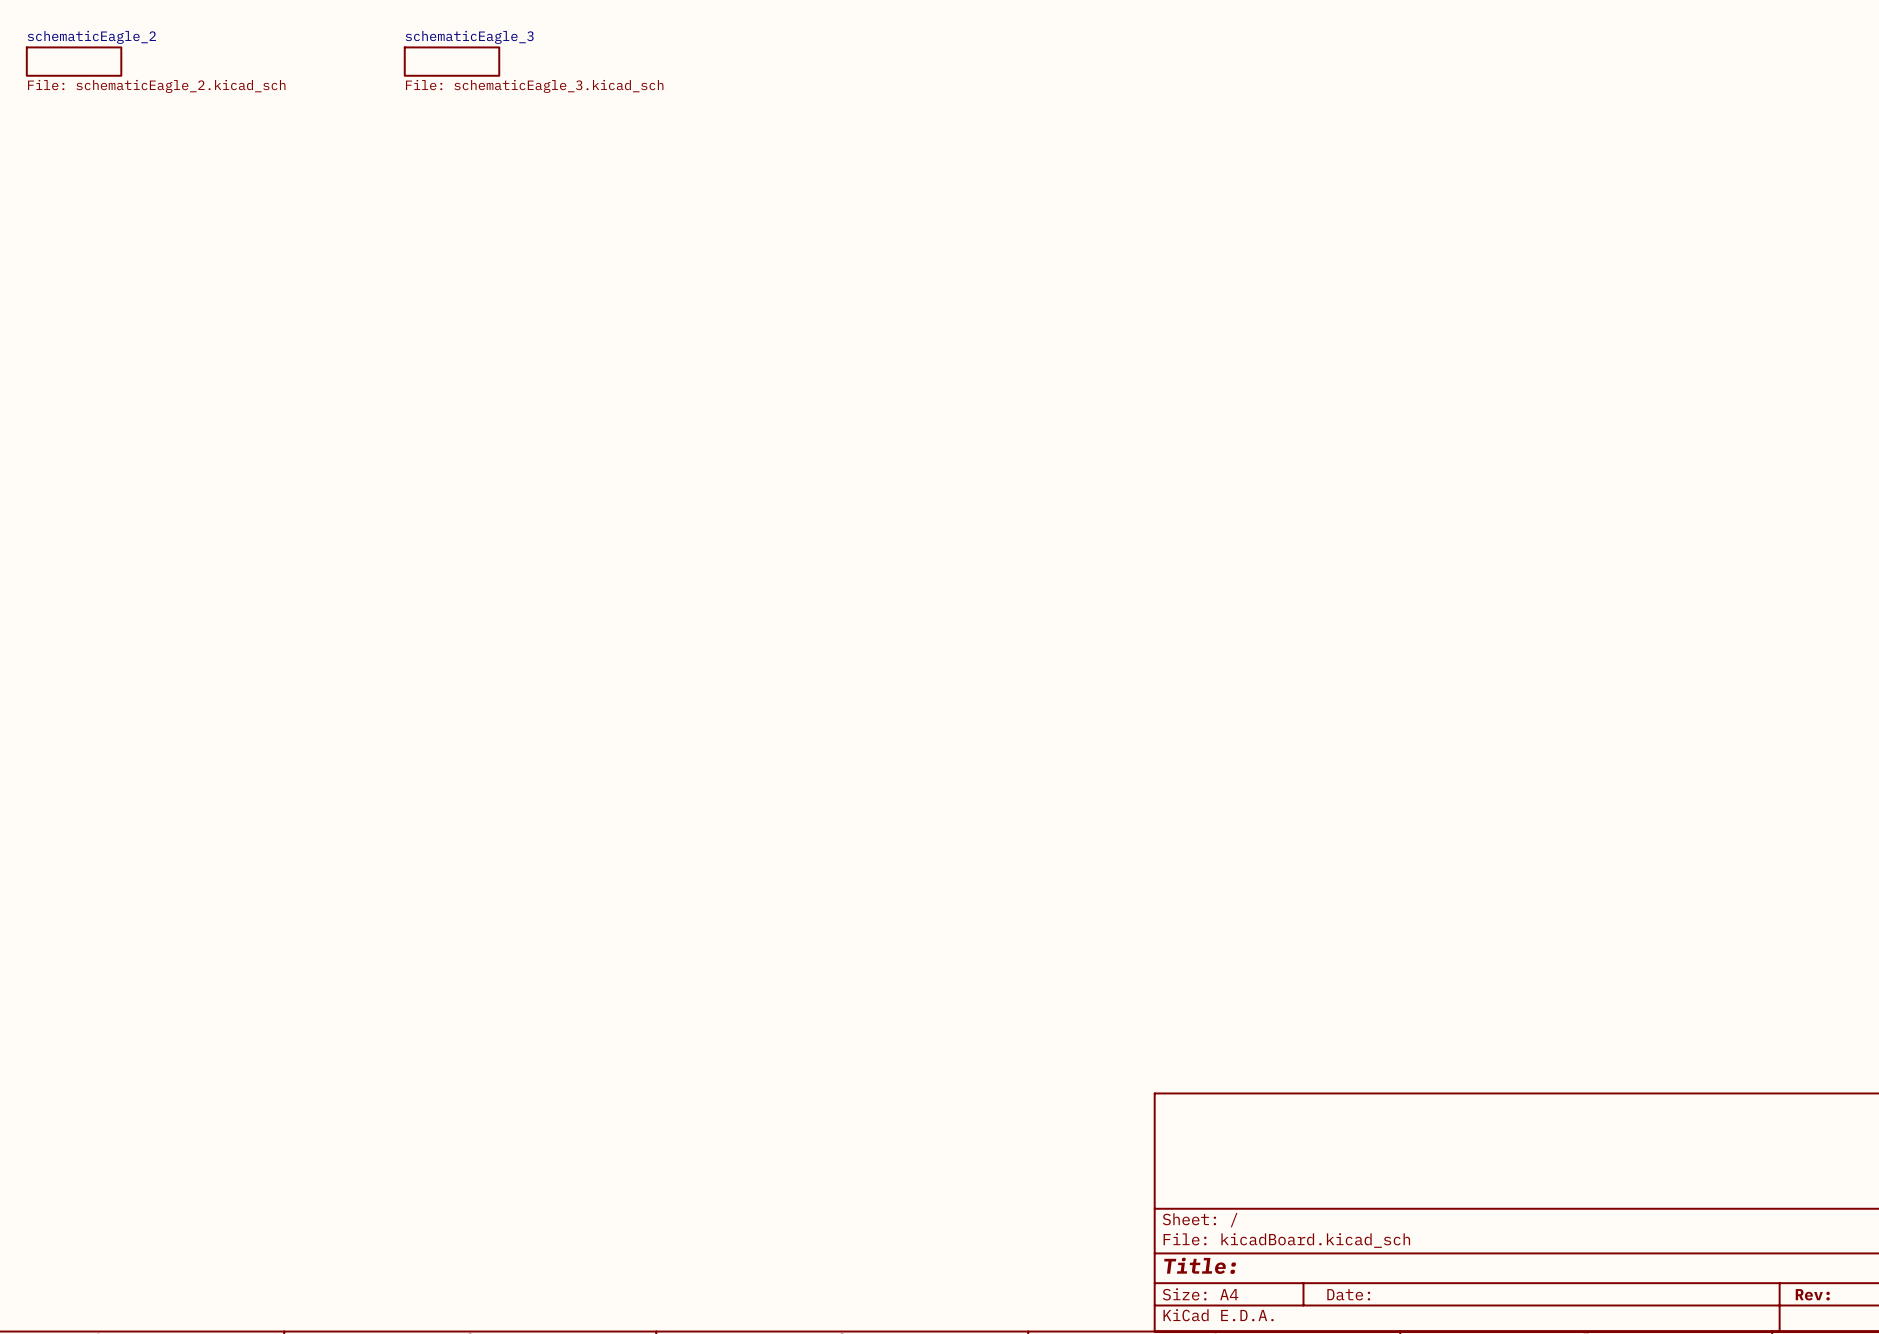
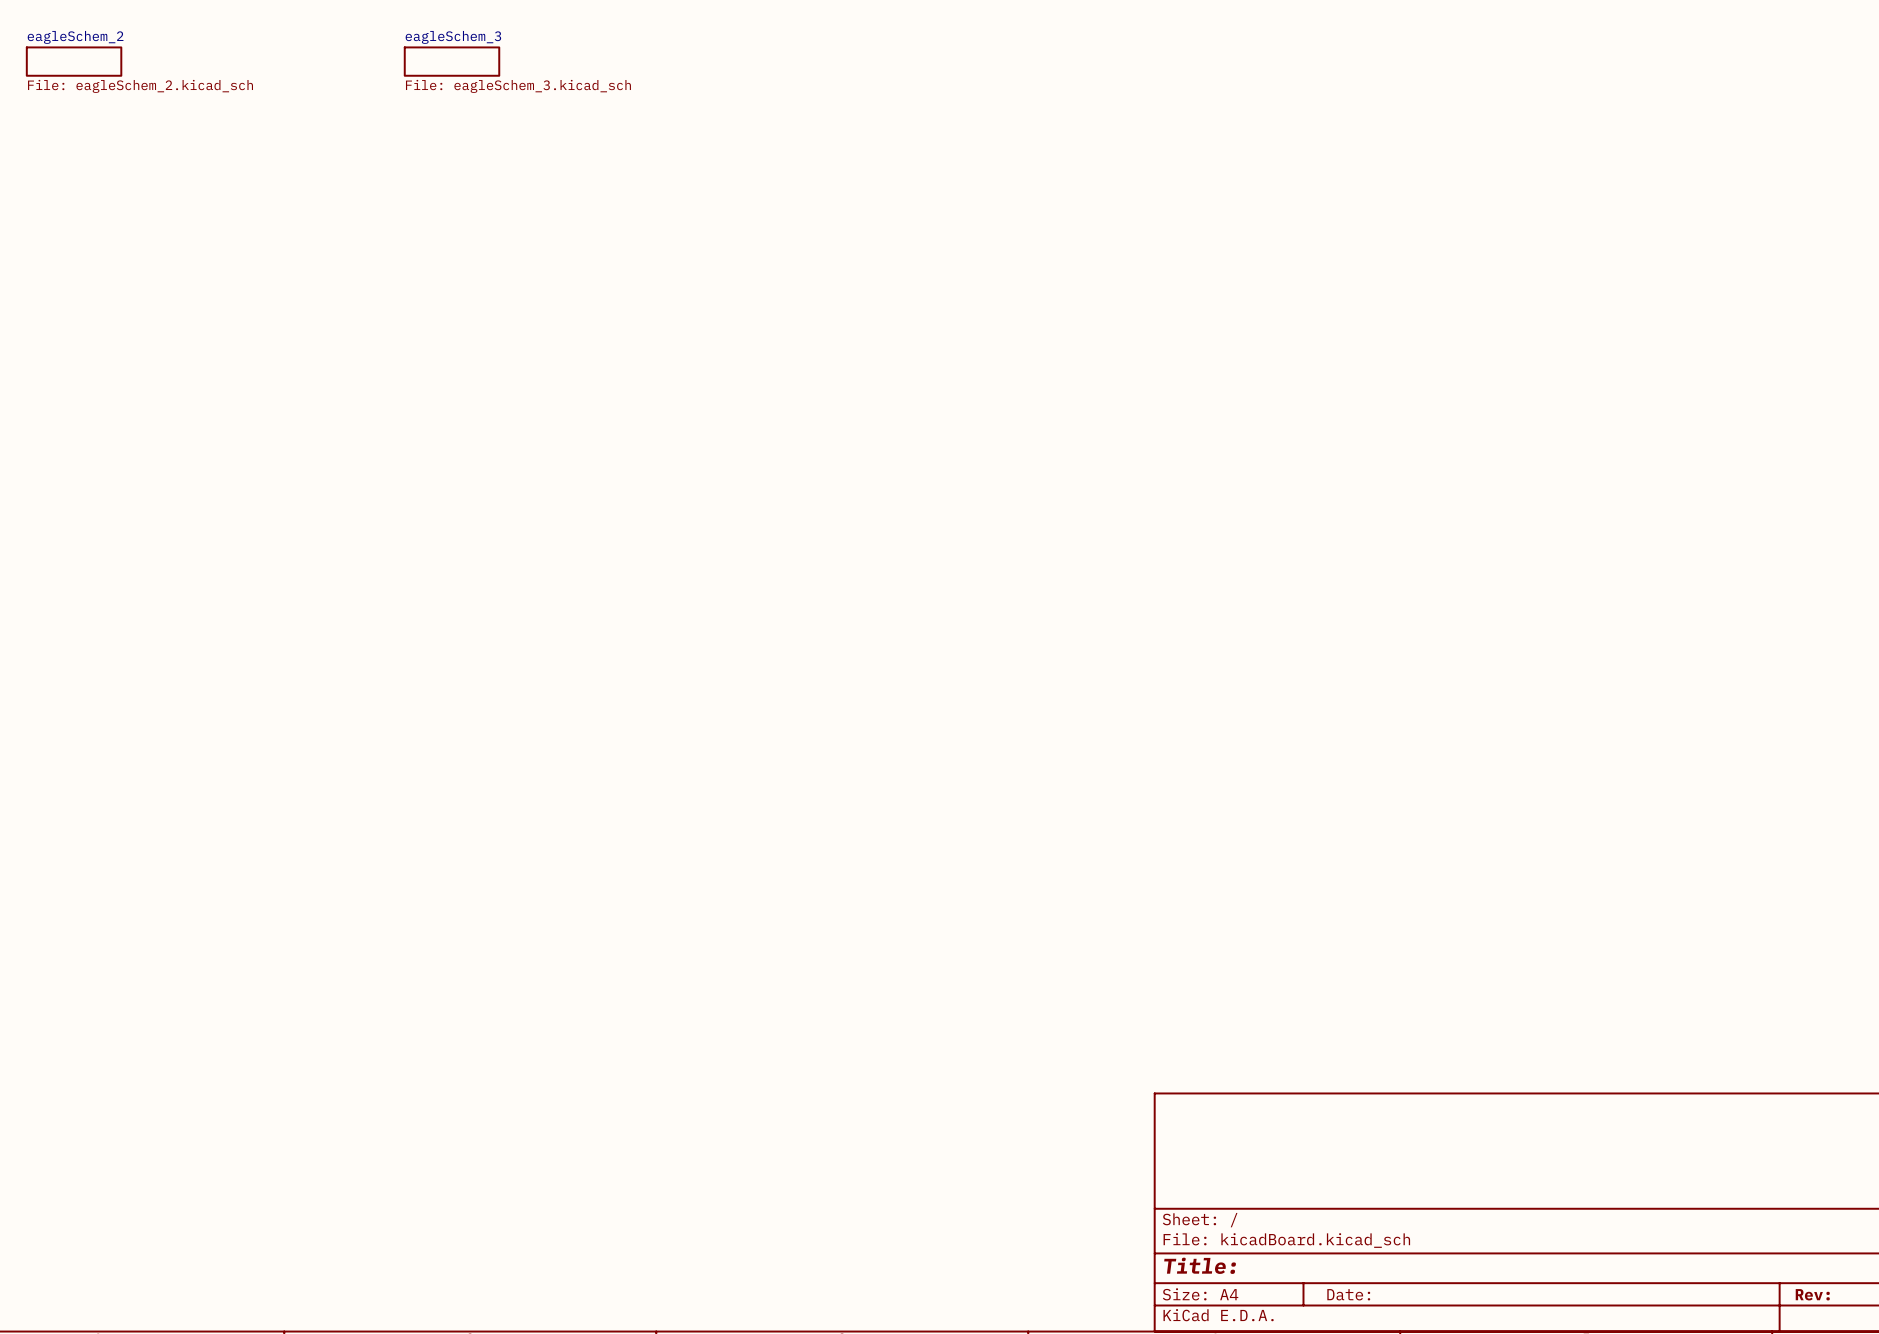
sheet schematicEagle_2 name: schematicEagle_2 (91, 37) -> eagleSchem_2 (75, 37)
sheet schematicEagle_3 name: schematicEagle_3 (469, 37) -> eagleSchem_3 (453, 37)
sheet schematicEagle_2 value: File: schematicEagle_2.kicad_sch (156, 86) -> File: eagleSchem_2.kicad_sch (140, 86)
sheet schematicEagle_3 value: File: schematicEagle_3.kicad_sch (534, 86) -> File: eagleSchem_3.kicad_sch (518, 86)

